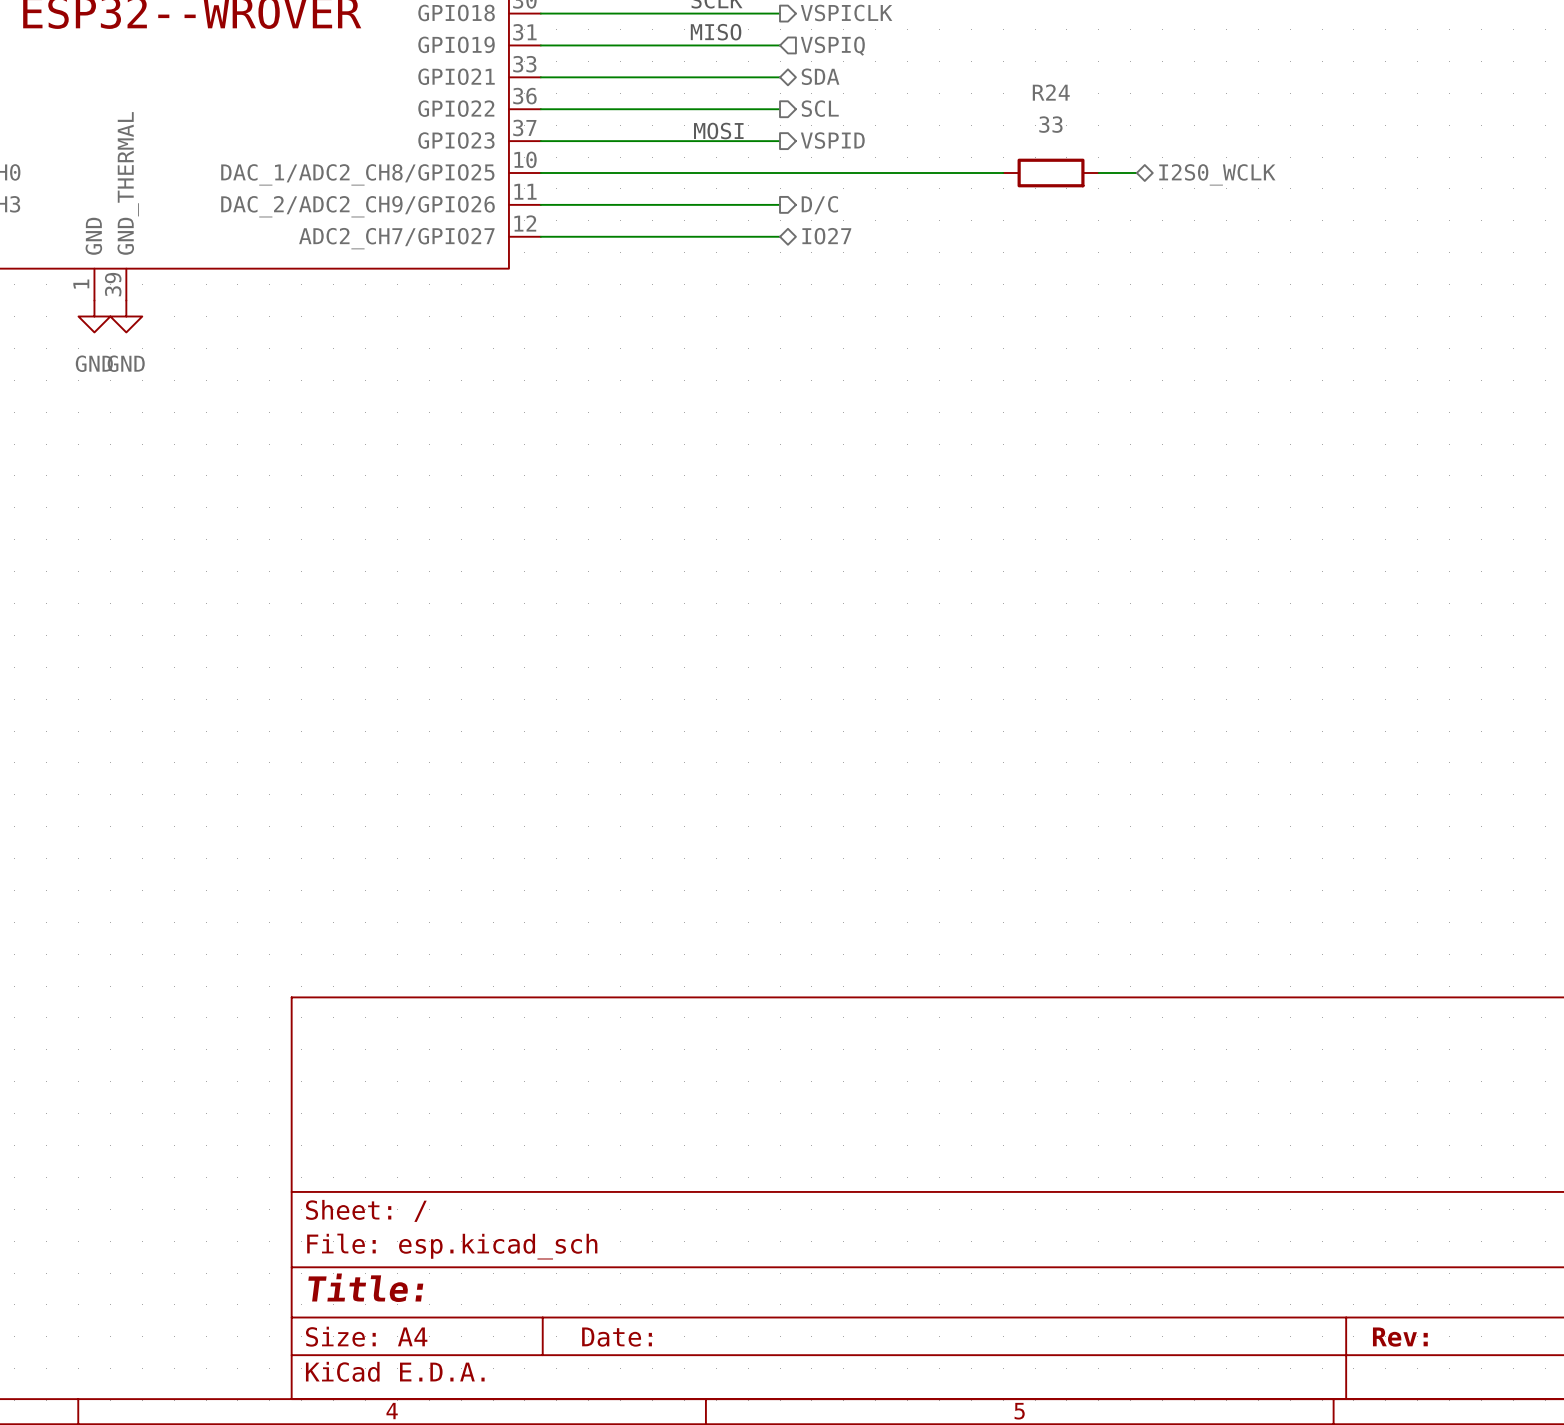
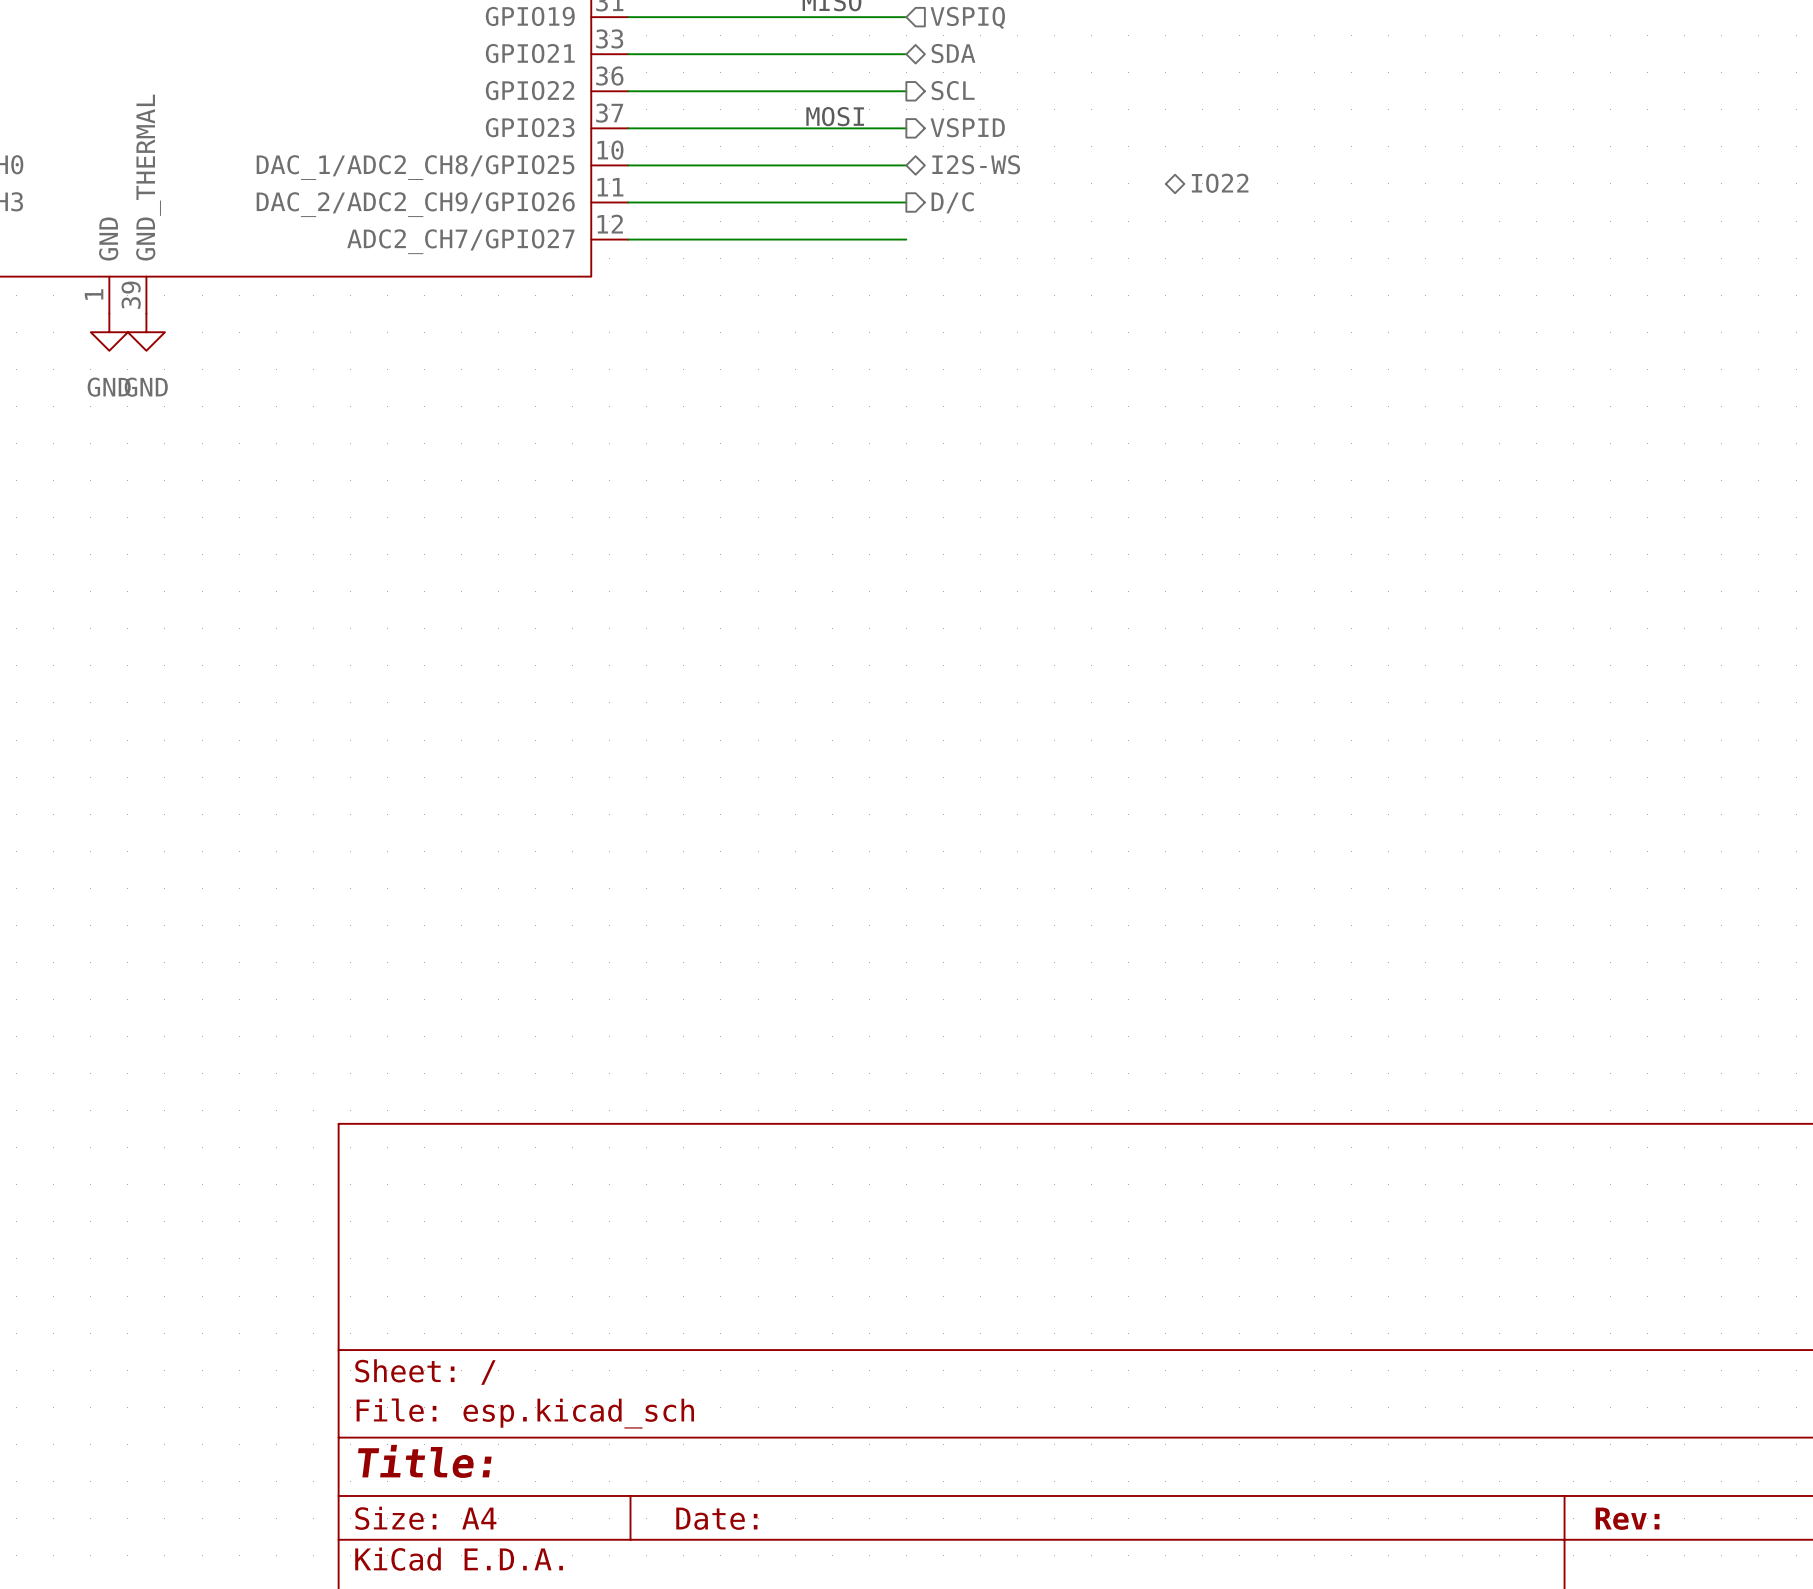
hierarchical label: none -> I2S-WS (976, 164)
wire: (780, 173) (1003, 173) -> none
R24: 33 (1051, 173) -> none
wire: (1098, 173) (1136, 173) -> none
hierarchical label: I2S0_WCLK (1217, 174) -> none
hierarchical label: none -> IO22 (1220, 183)
hierarchical label: IO27 (826, 236) -> none

